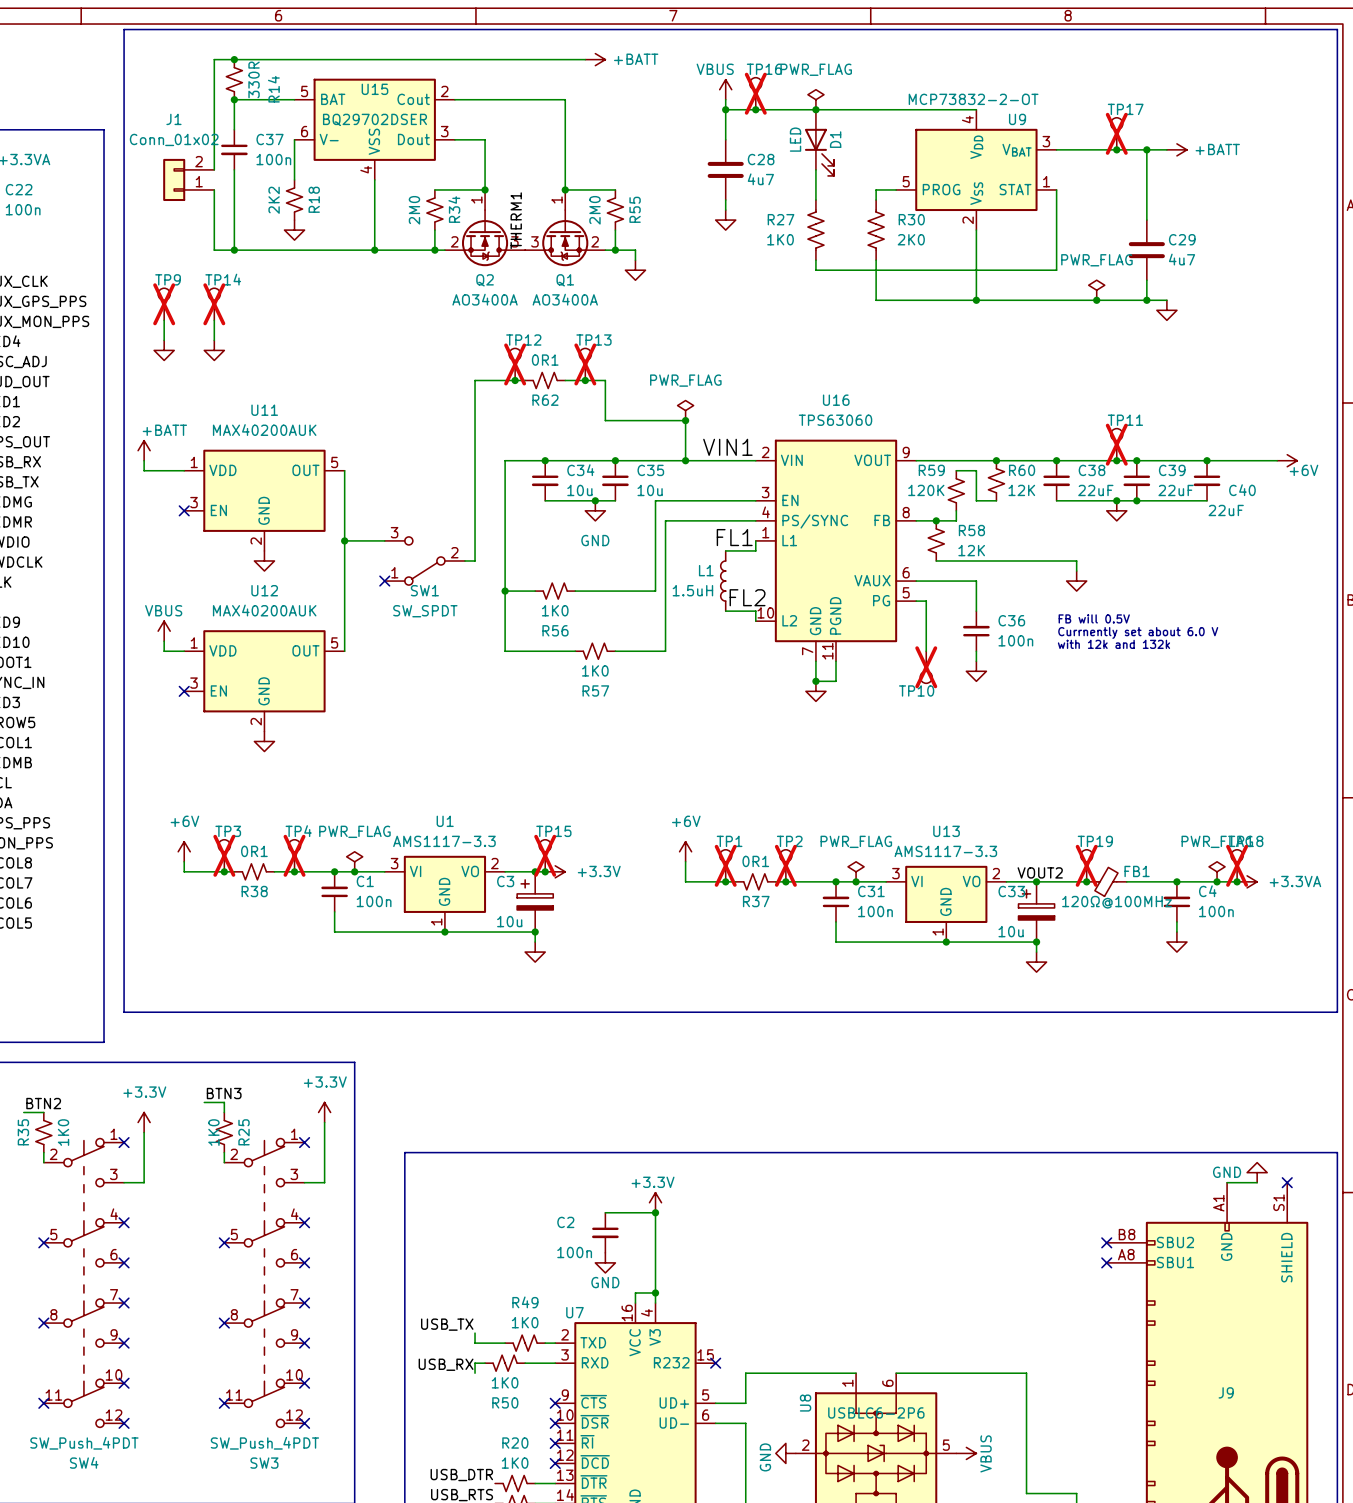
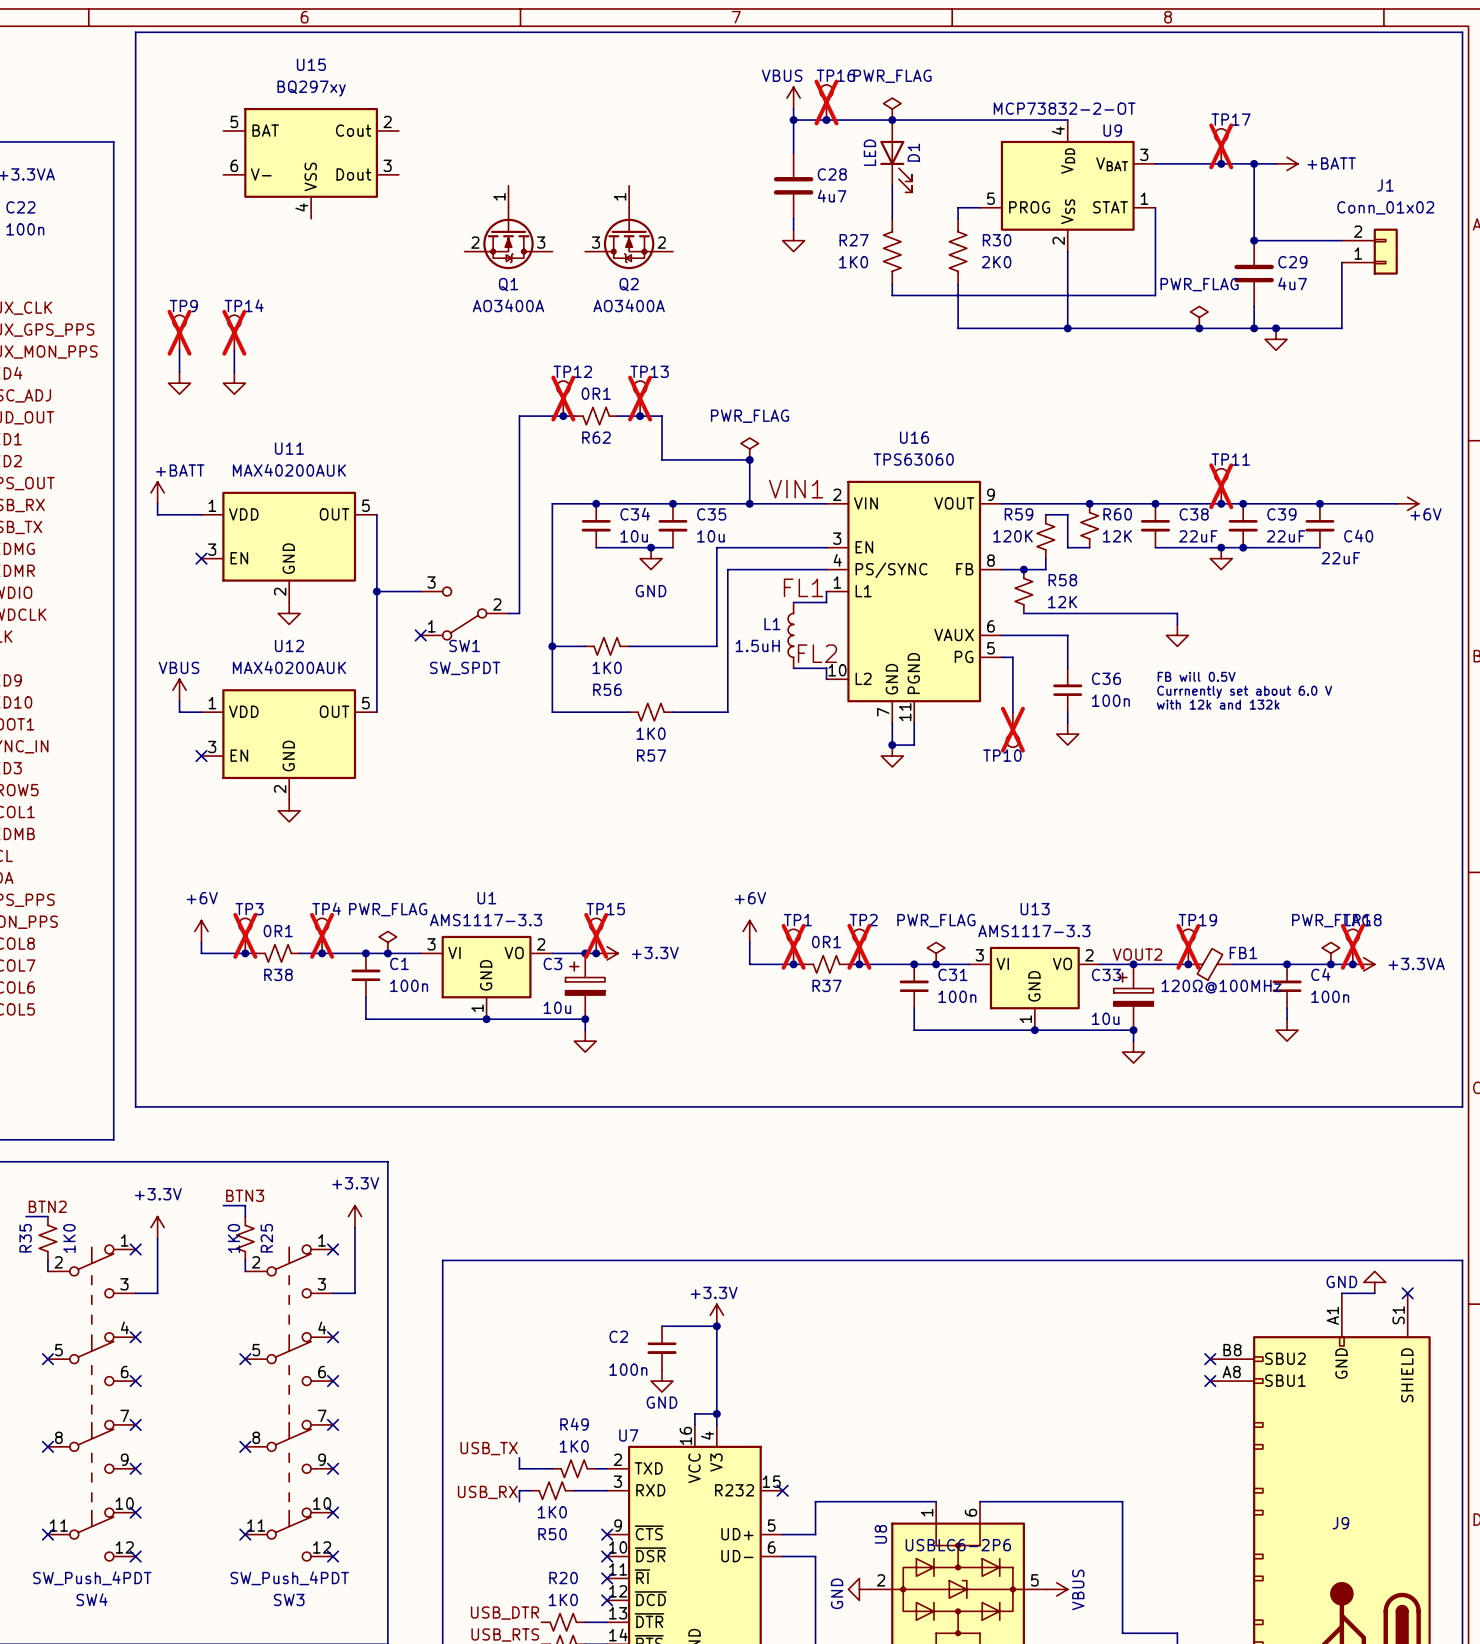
junction: (234, 59) -> none
wire: (585, 59) (214, 59) (214, 169) -> none
power symbol: +BATT (595, 59) -> none
R14: 330R (234, 79) -> none
U15 name position: U15 (374, 89) -> U15 (311, 64)
junction: (234, 99) -> none
wire: (454, 99) (565, 99) (565, 189) (615, 189) -> none
U15 value: BQ29702DSER (374, 119) -> BQ297xy (311, 88)
U15 position: (374, 129) -> (311, 163)
wire: (454, 139) (485, 139) (485, 189) (434, 189) -> none
C37: 100n (234, 149) -> none
wire: (234, 169) (234, 250) -> none
J1 flip: as is (174, 179) -> left-right (1385, 251)
J1 position: (188, 179) -> (1369, 251)
wire: (374, 179) (374, 250) -> none
wire: (214, 189) (214, 250) (444, 250) -> none
junction: (485, 189) -> none
junction: (565, 189) -> none
R18: 2K2 (294, 200) -> none
R34: 2M0 (434, 210) -> none
R55: 2M0 (615, 210) -> none
label: THERM1 (516, 220) -> none
wire: none -> (1254, 240) (1341, 240)
junction: none -> (1254, 240)
Q2 position: (485, 228) -> (629, 227)
Q1 position: (565, 228) -> (508, 227)
power symbol: (294, 230) -> none
wire: (434, 230) (434, 250) -> none
wire: (615, 230) (615, 250) -> none
Q2 flip: as is (485, 238) -> left-right (629, 238)
Q1 flip: as is (565, 238) -> left-right (508, 238)
wire: none -> (1341, 262) (1341, 328) (1276, 328)
junction: (234, 250) -> none
junction: (374, 250) -> none
junction: (434, 250) -> none
wire: (605, 250) (635, 250) (635, 260) -> none
junction: (615, 250) -> none
power symbol: (635, 270) -> none
junction: none -> (1276, 328)

